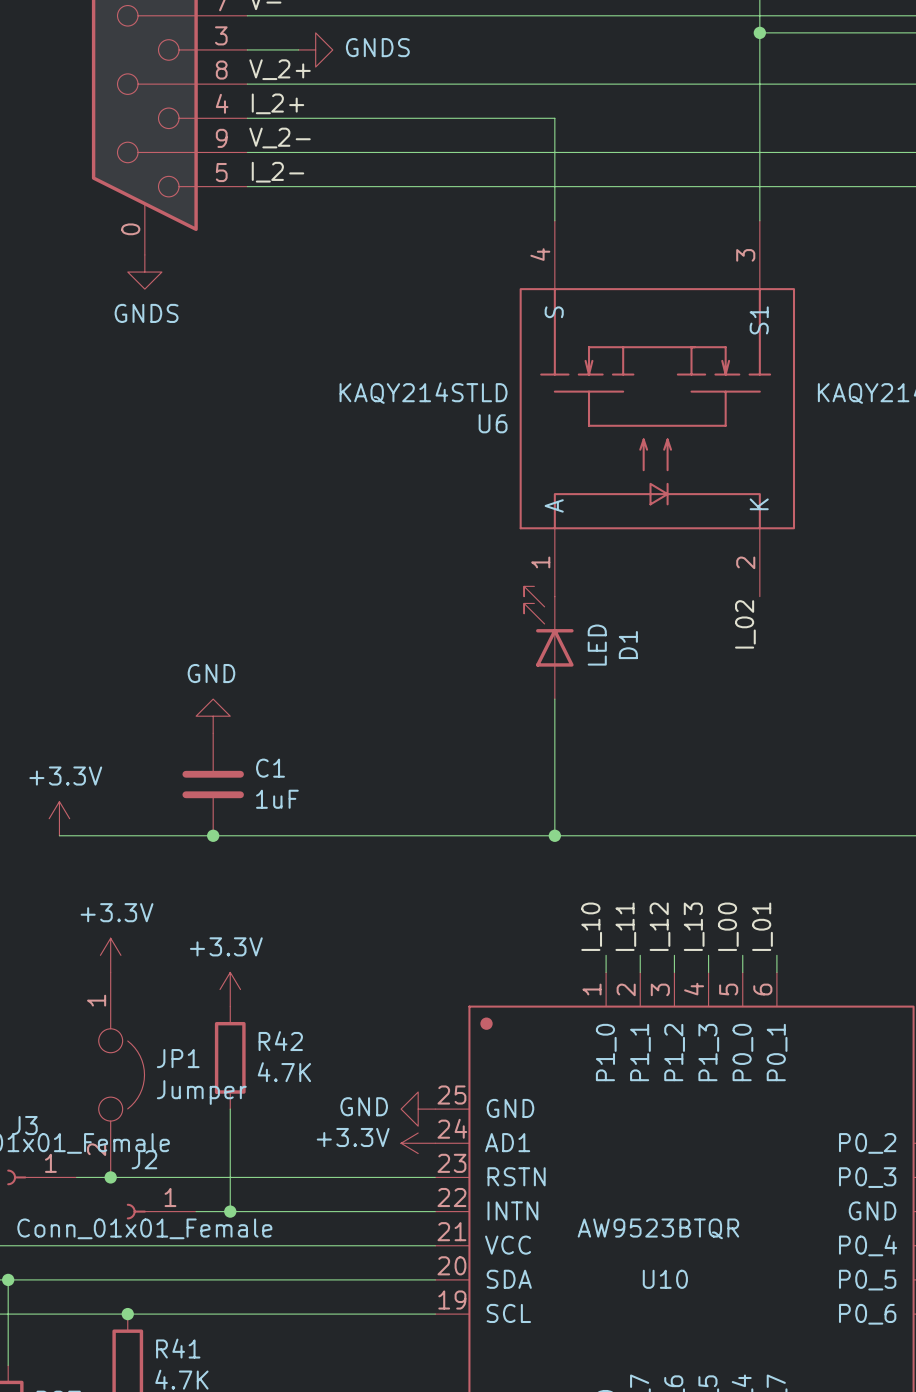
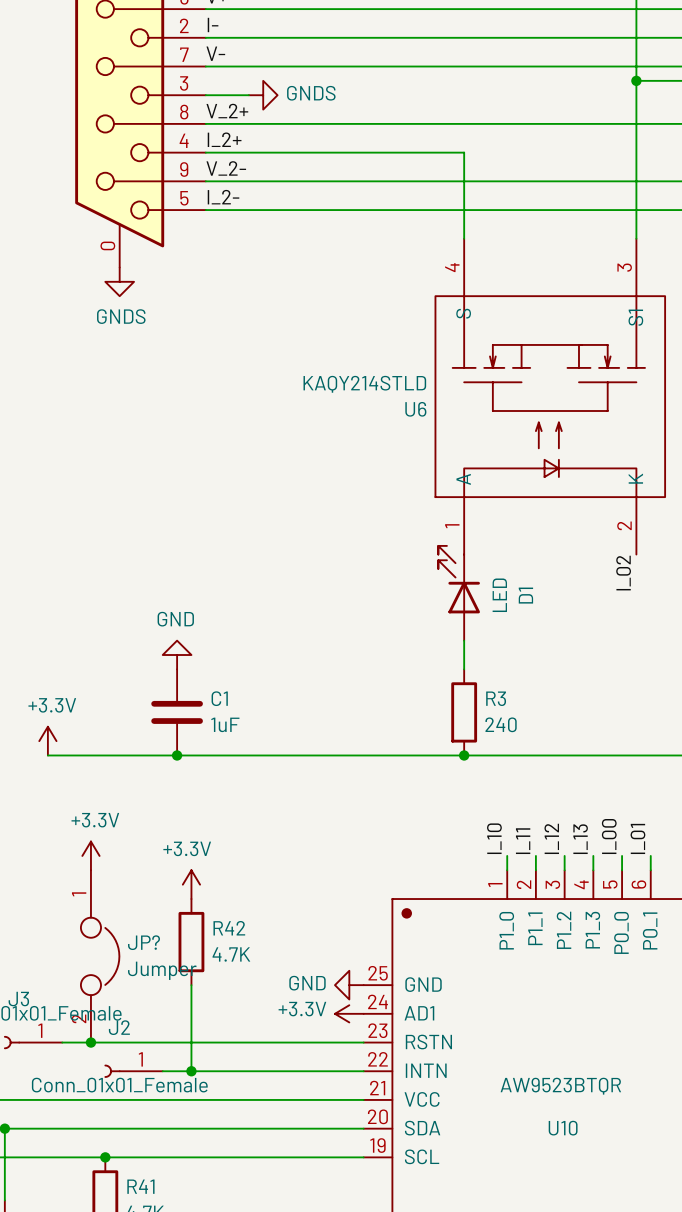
wire: (554, 733) (554, 835) -> none
R3: none -> 240 (464, 712)
JP1 name: JP1 (178, 1058) -> JP? (144, 942)

